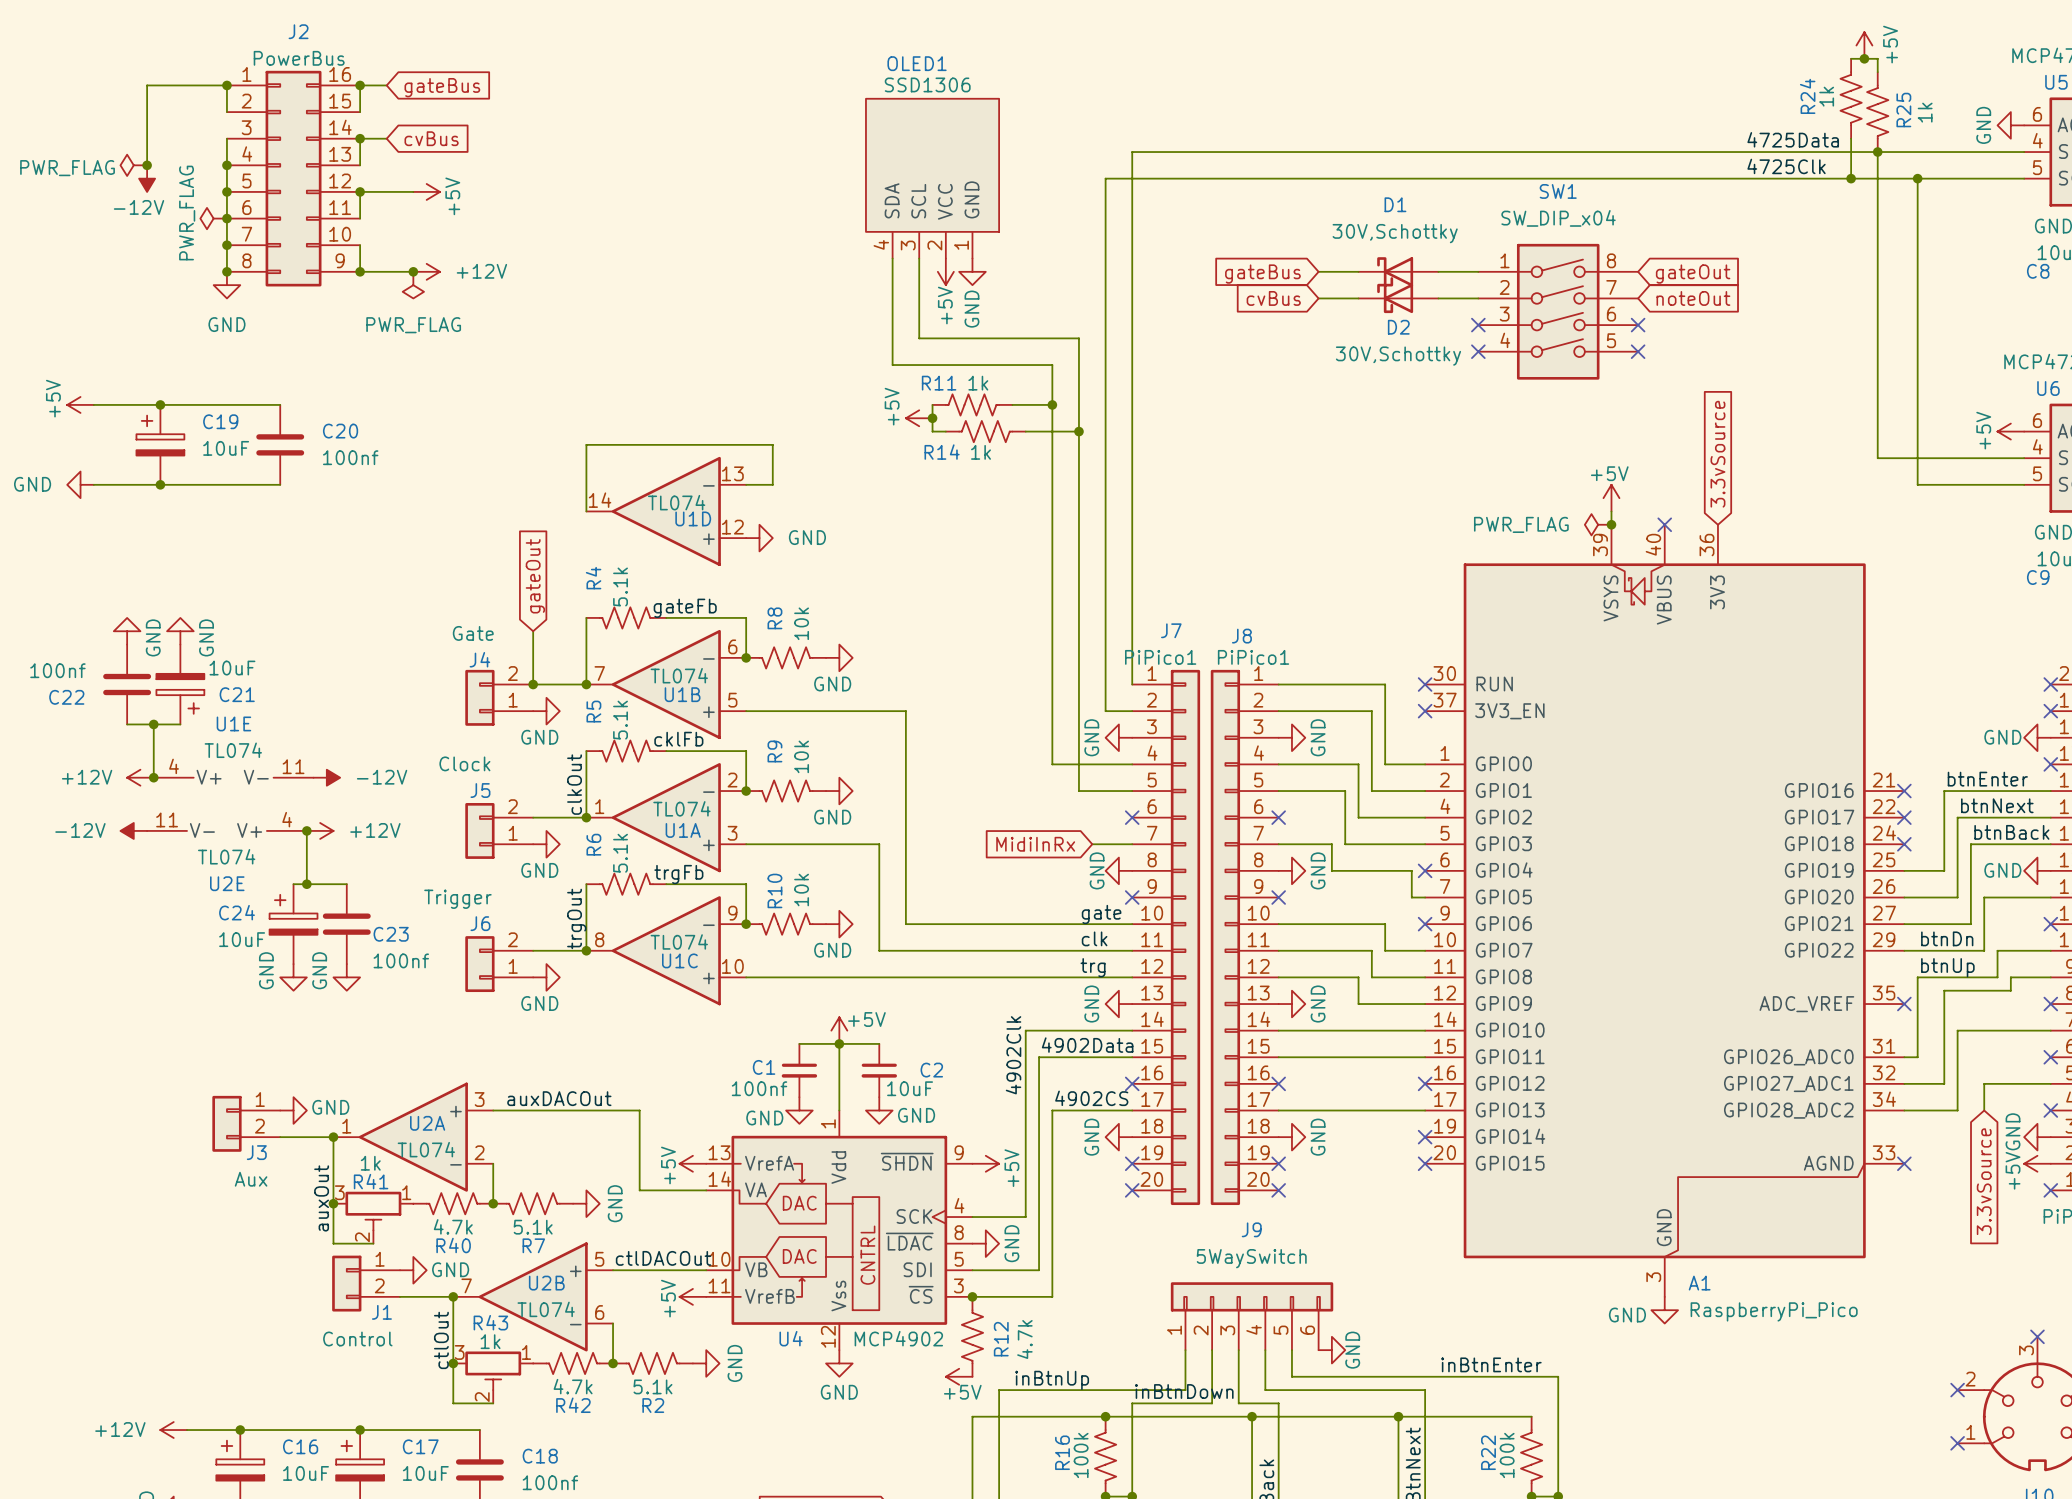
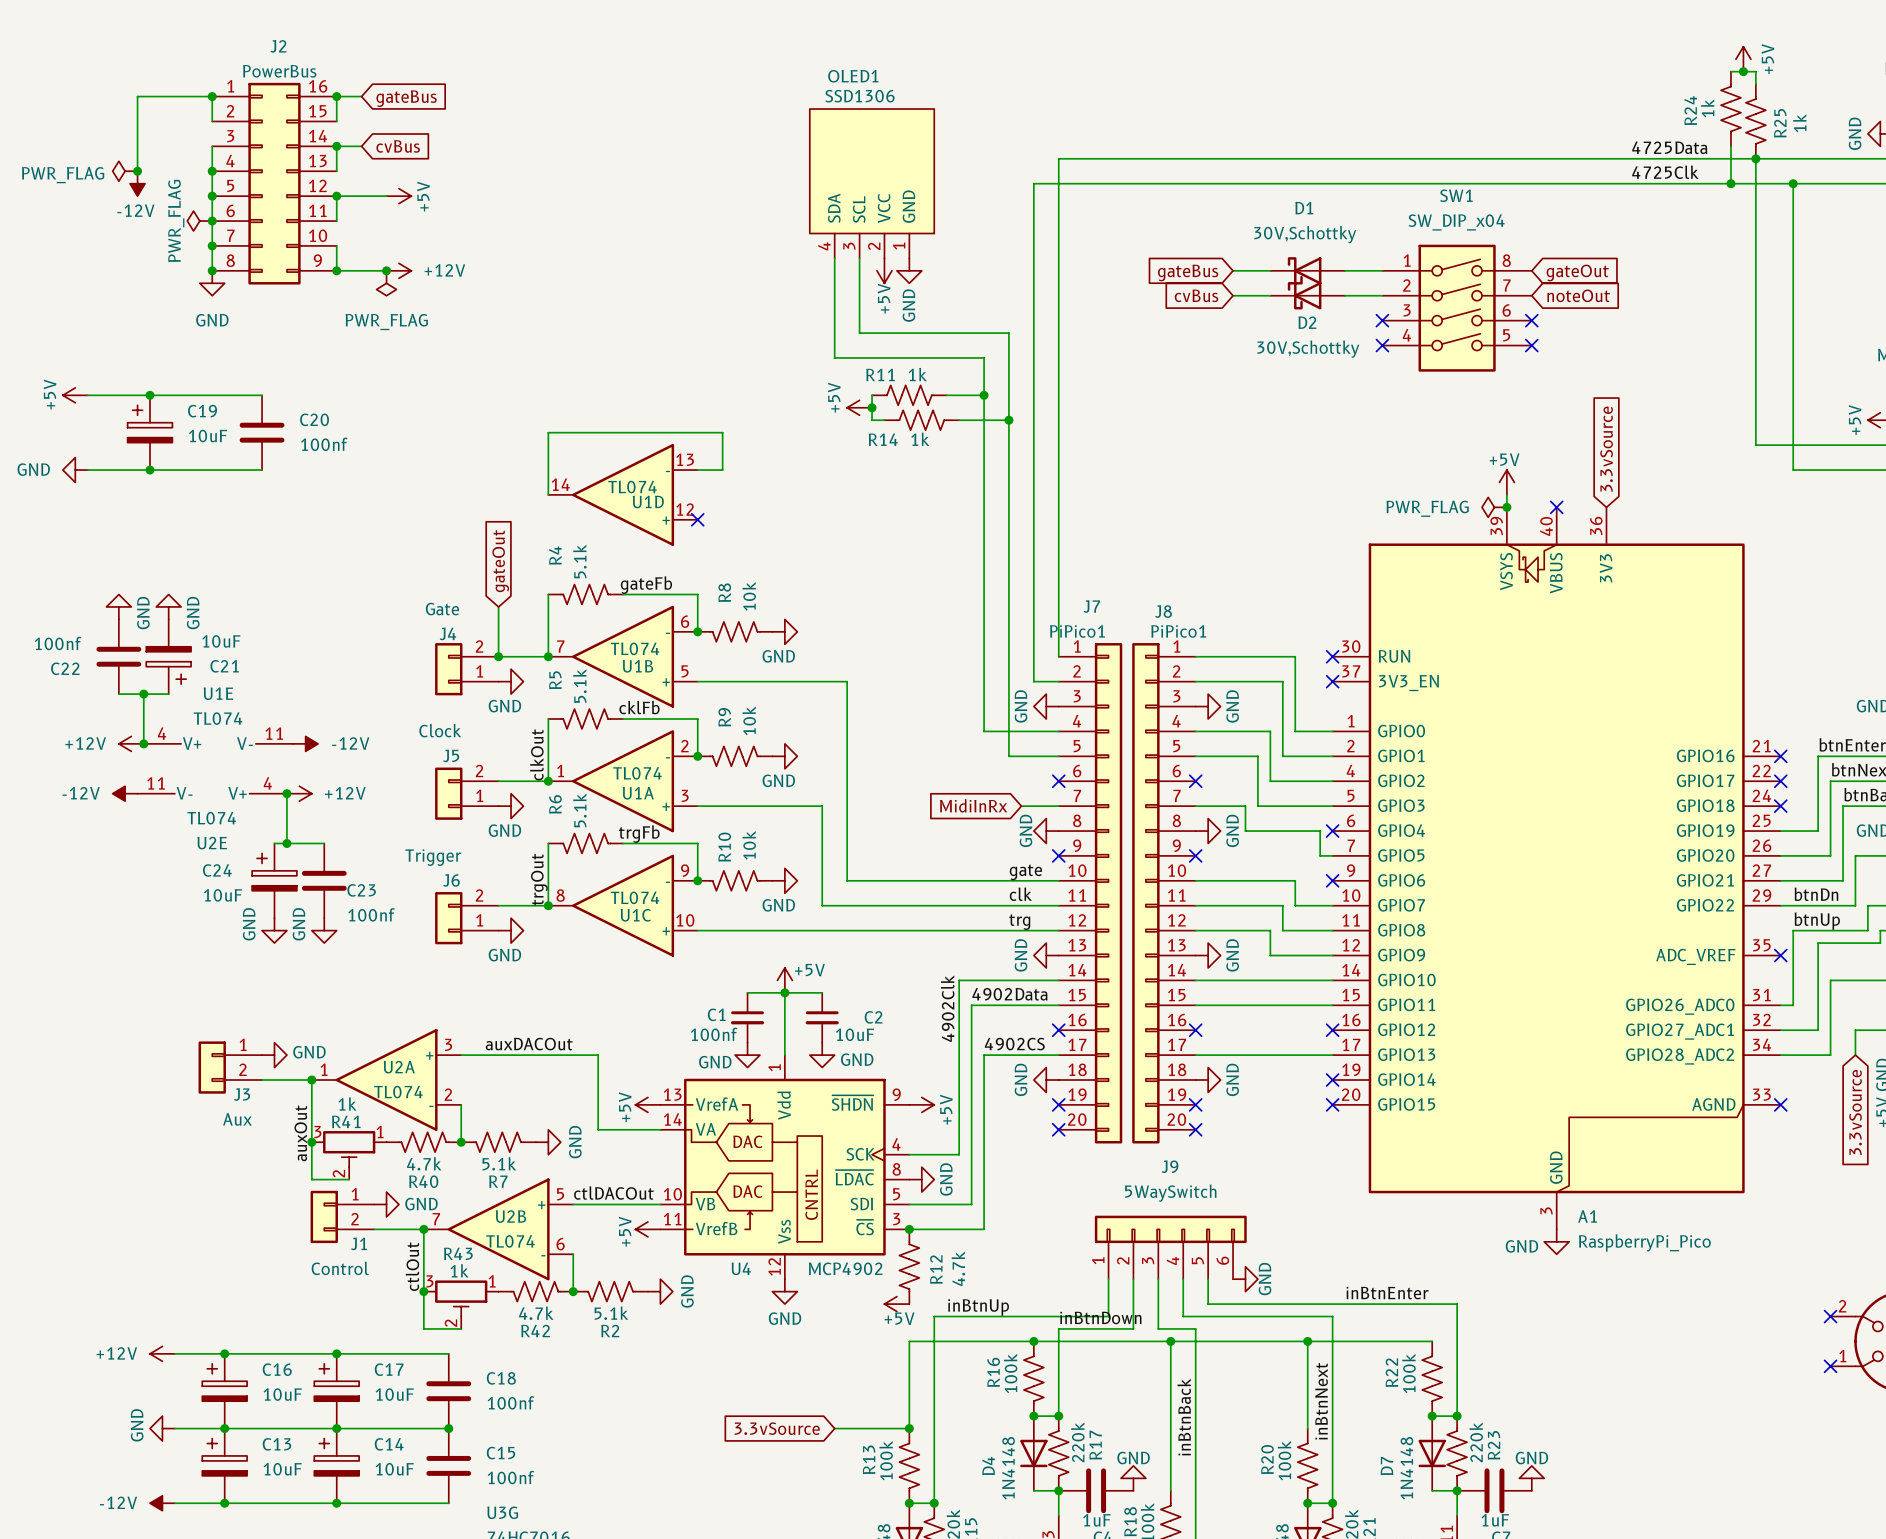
no-connect mark: none -> (697, 519)
power symbol: GND (759, 538) -> none

